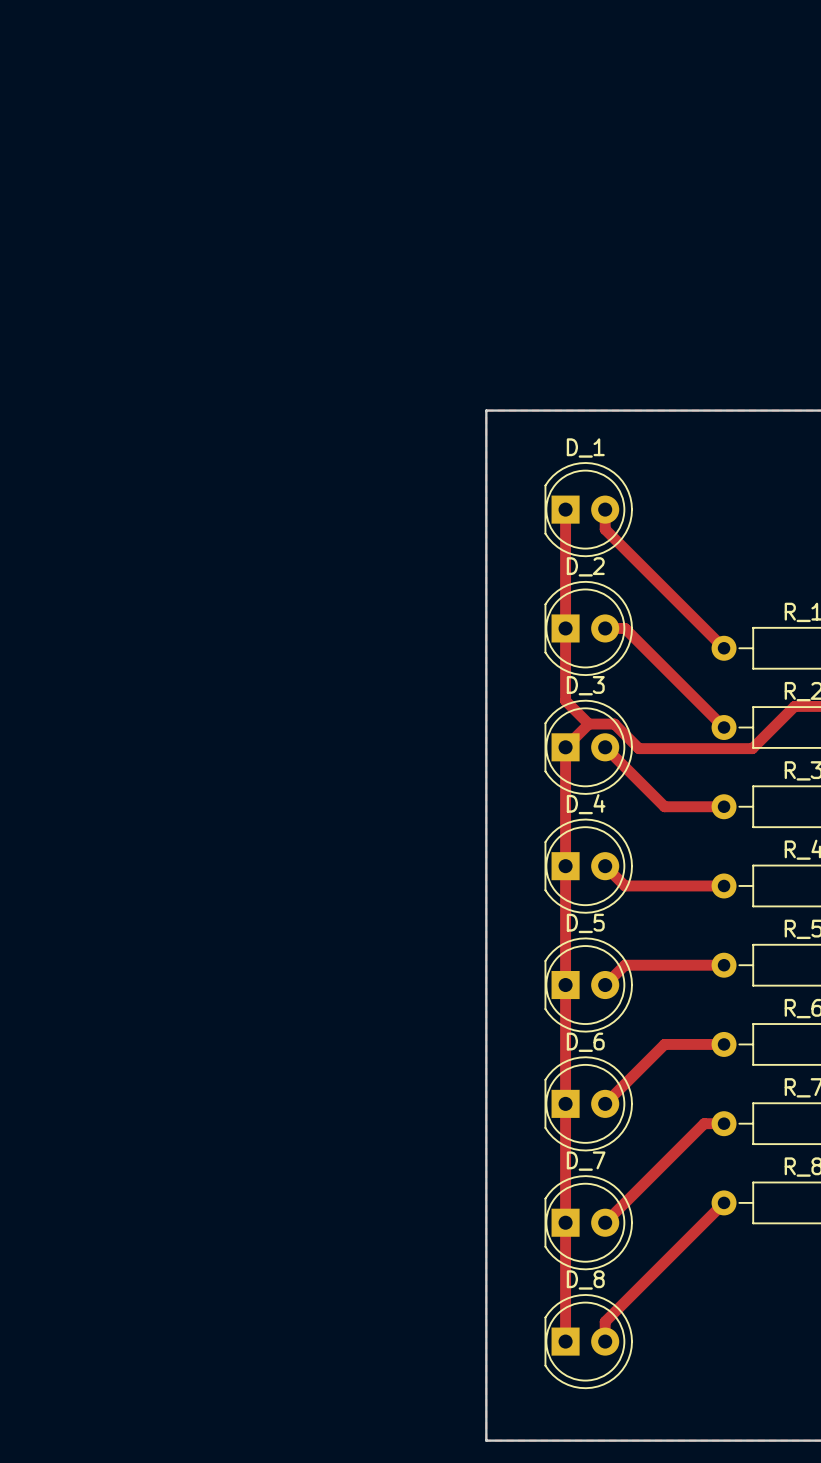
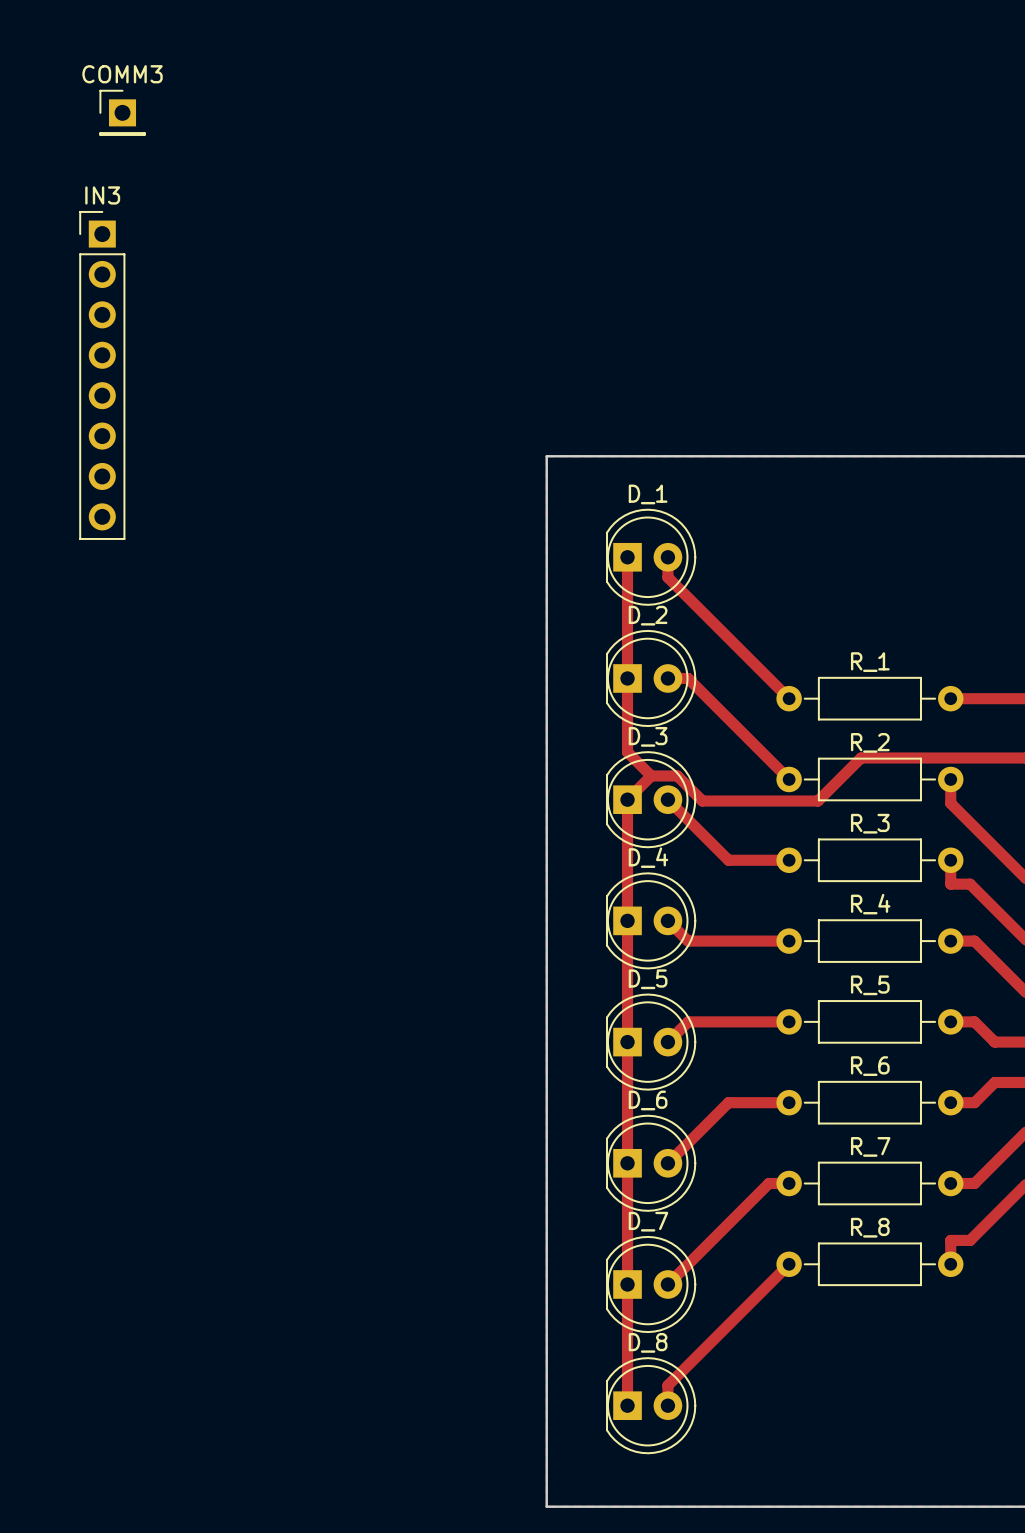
COMM3: none -> (122, 112)
IN3: none -> (102, 375)

